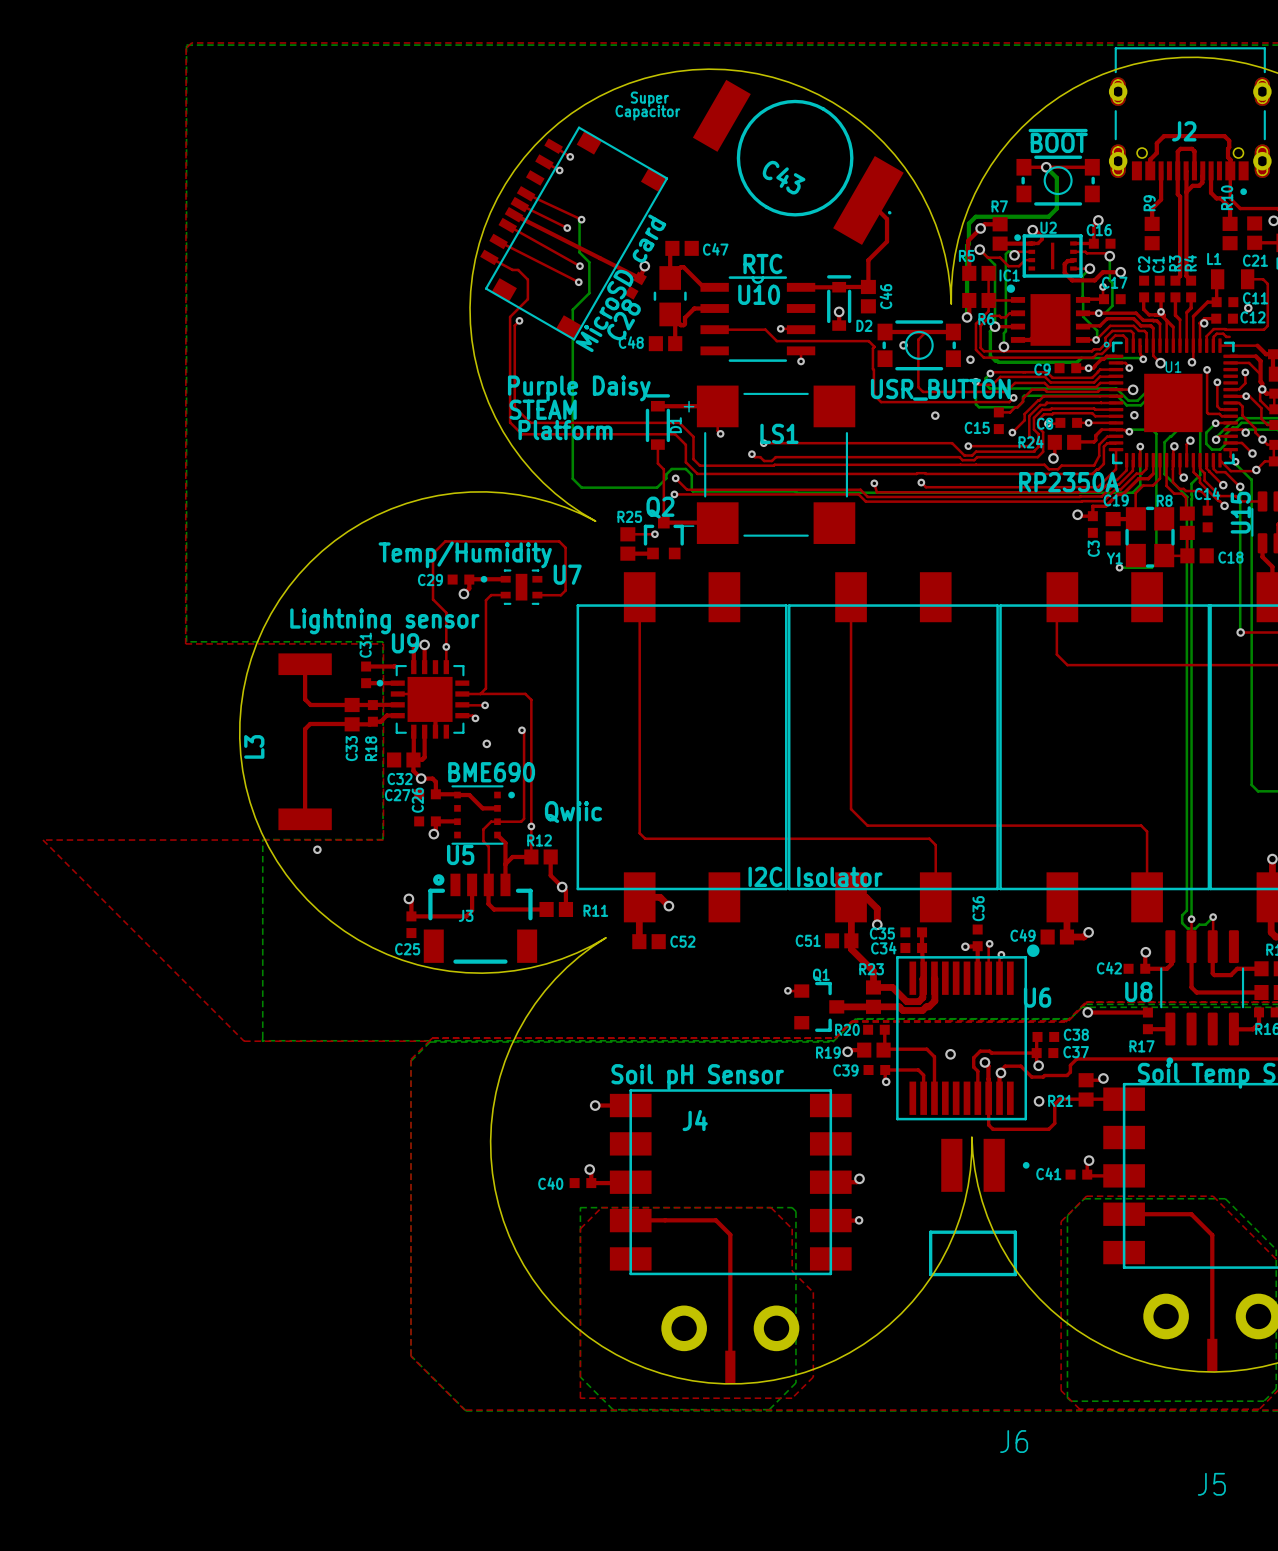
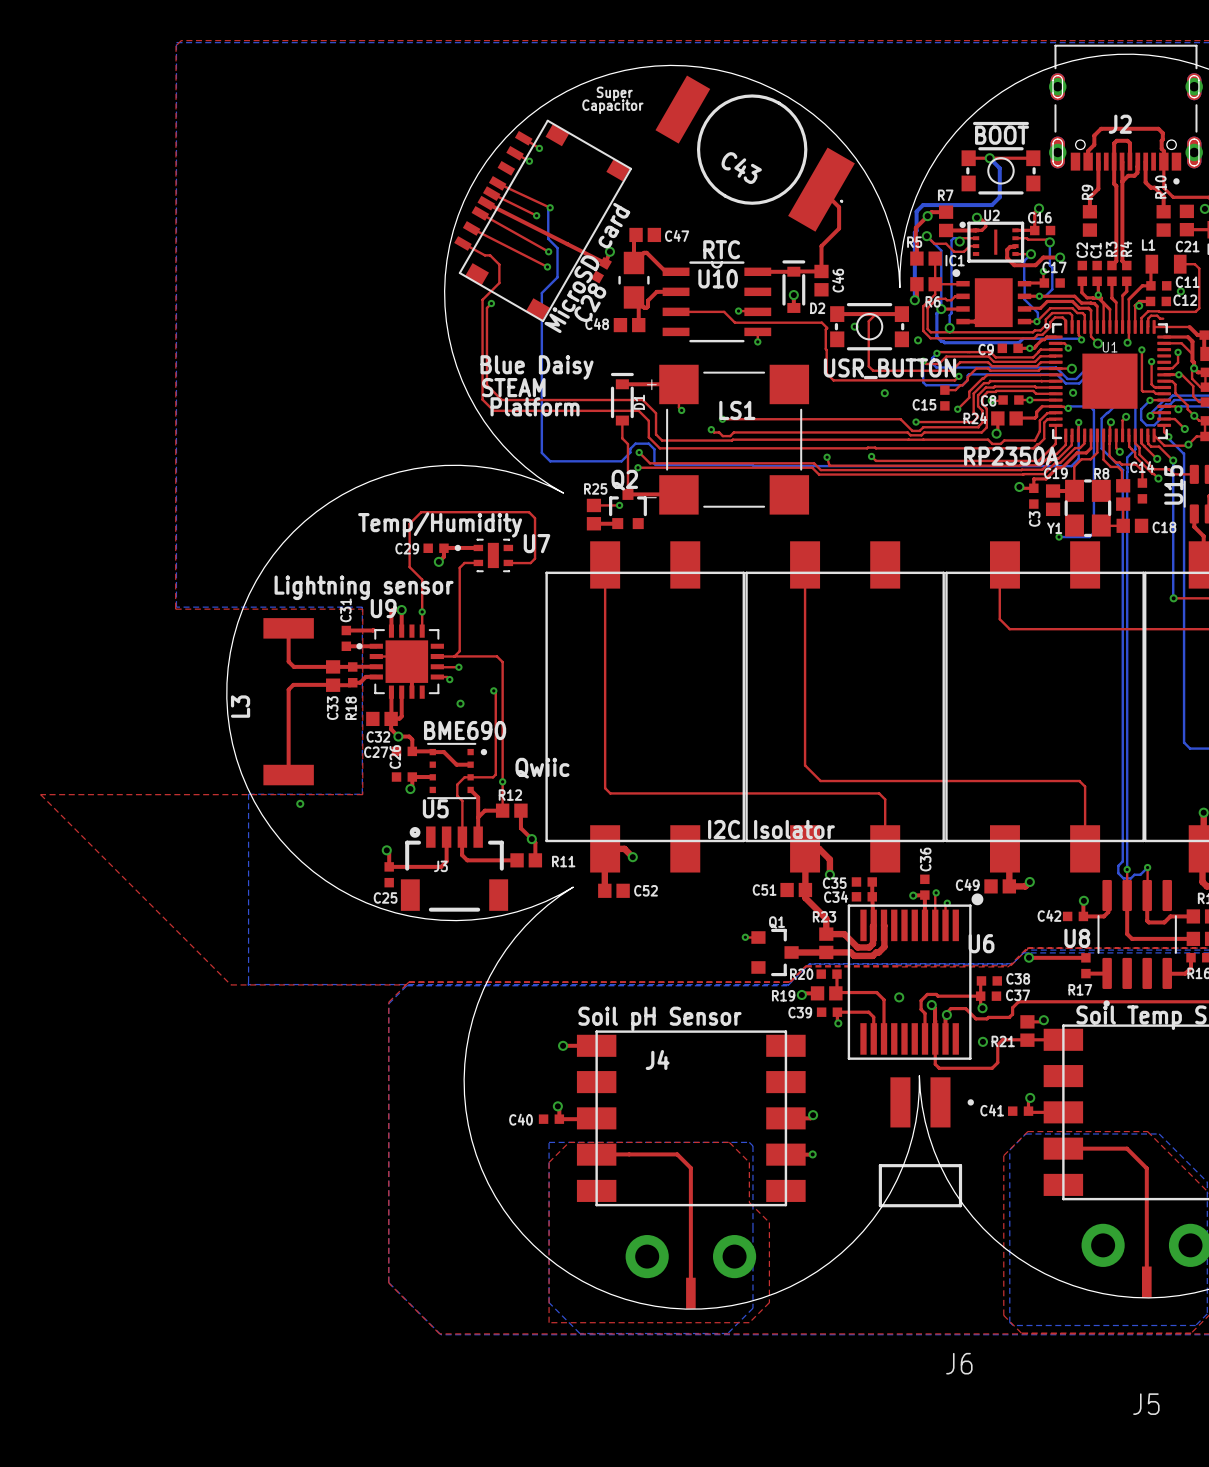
text: Purple Daisy (579, 388) -> Blue Daisy (537, 367)

